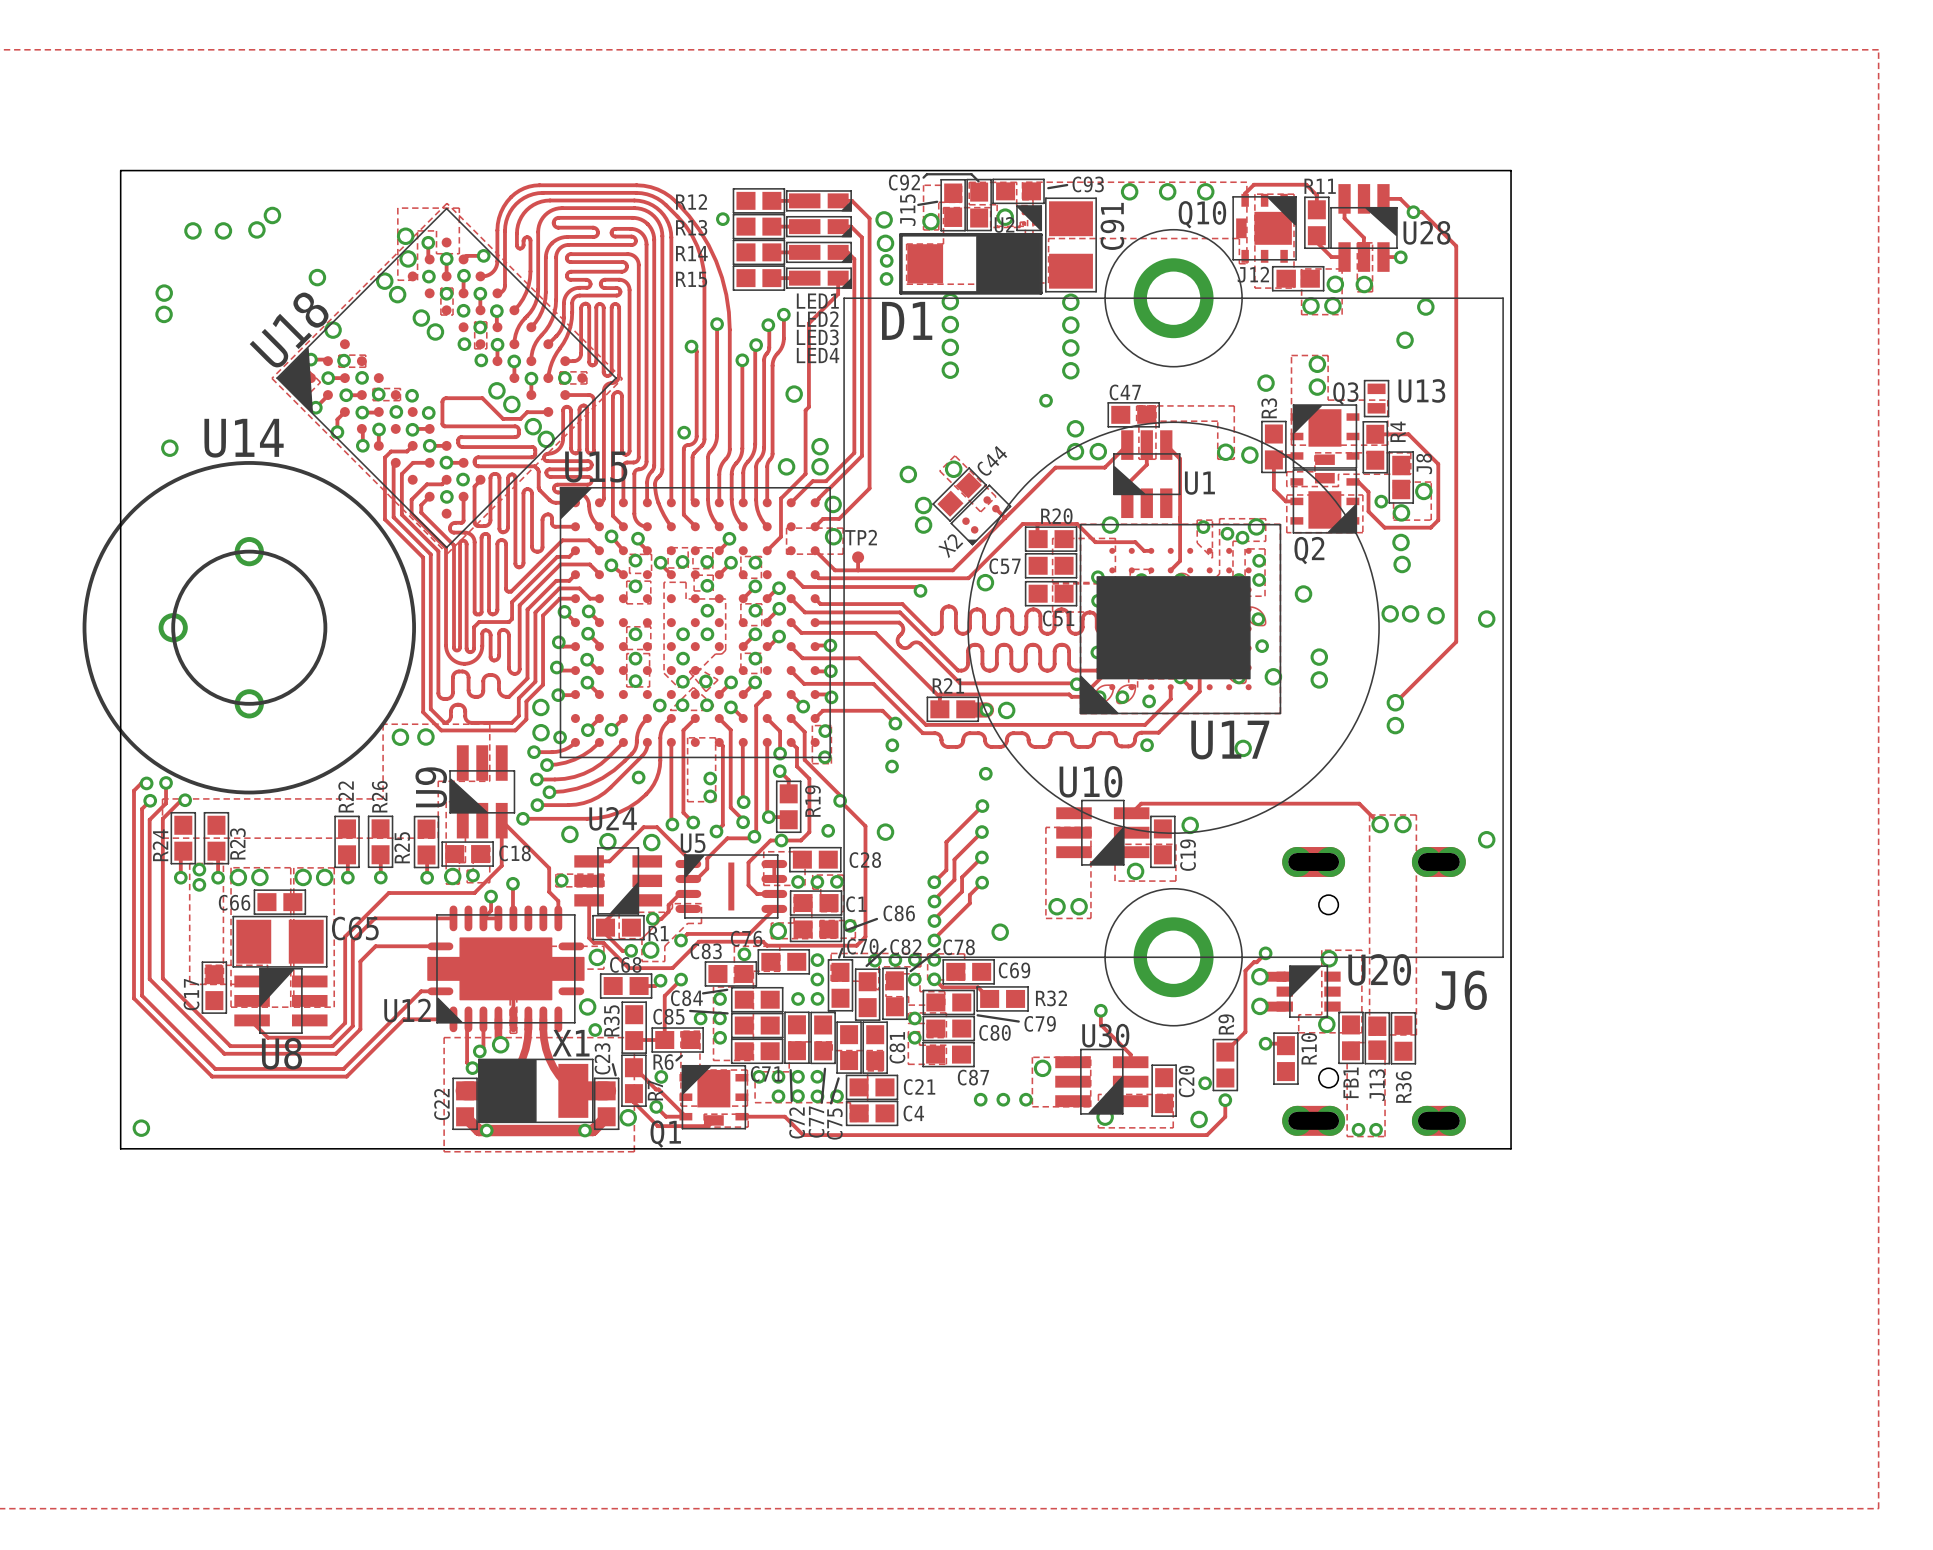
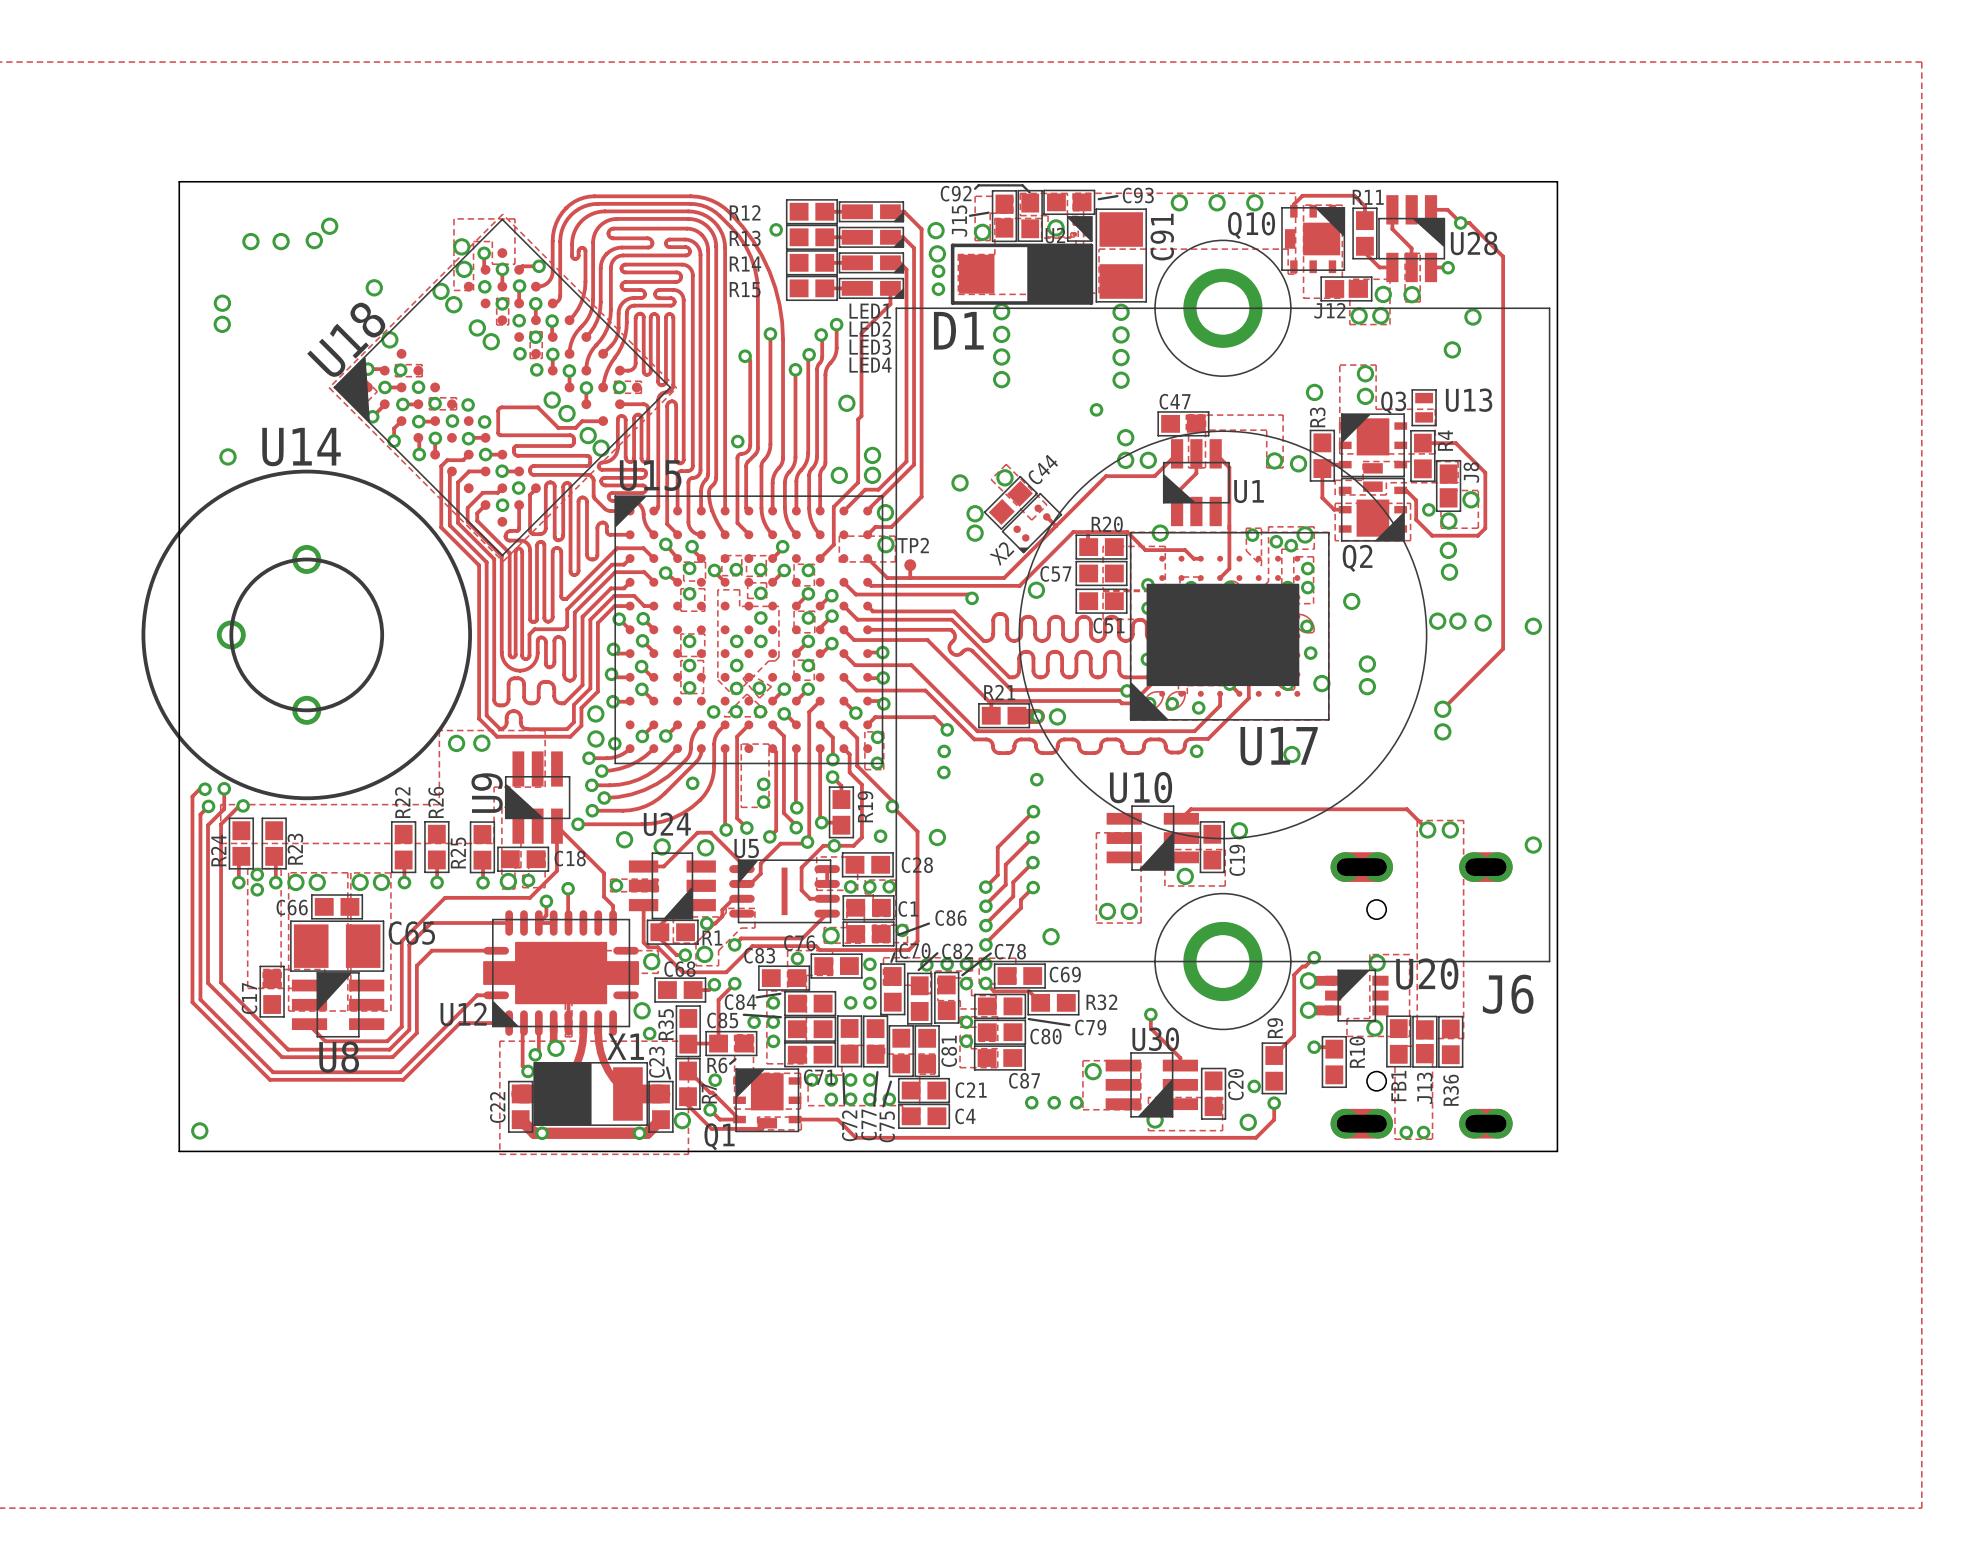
J12 name position: J12 (1253, 274) -> J12 (1329, 310)

